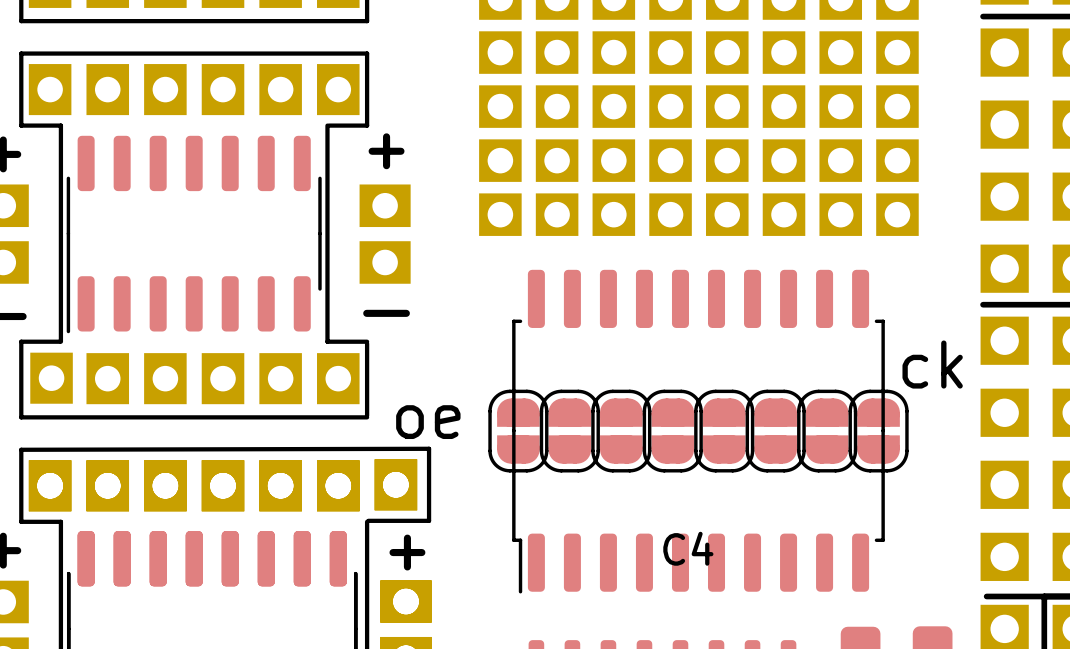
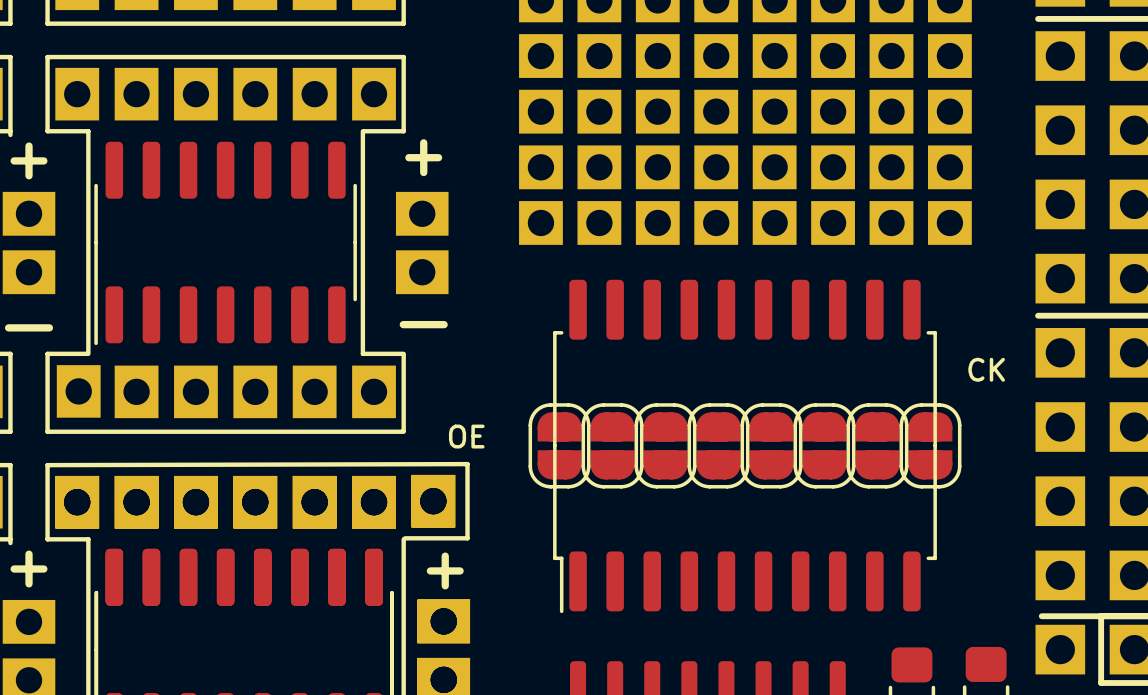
text: none -> CK (986, 369)
text: ck (932, 364) -> none
text: oe (428, 422) -> OE (466, 436)
C4: (688, 548) -> none

